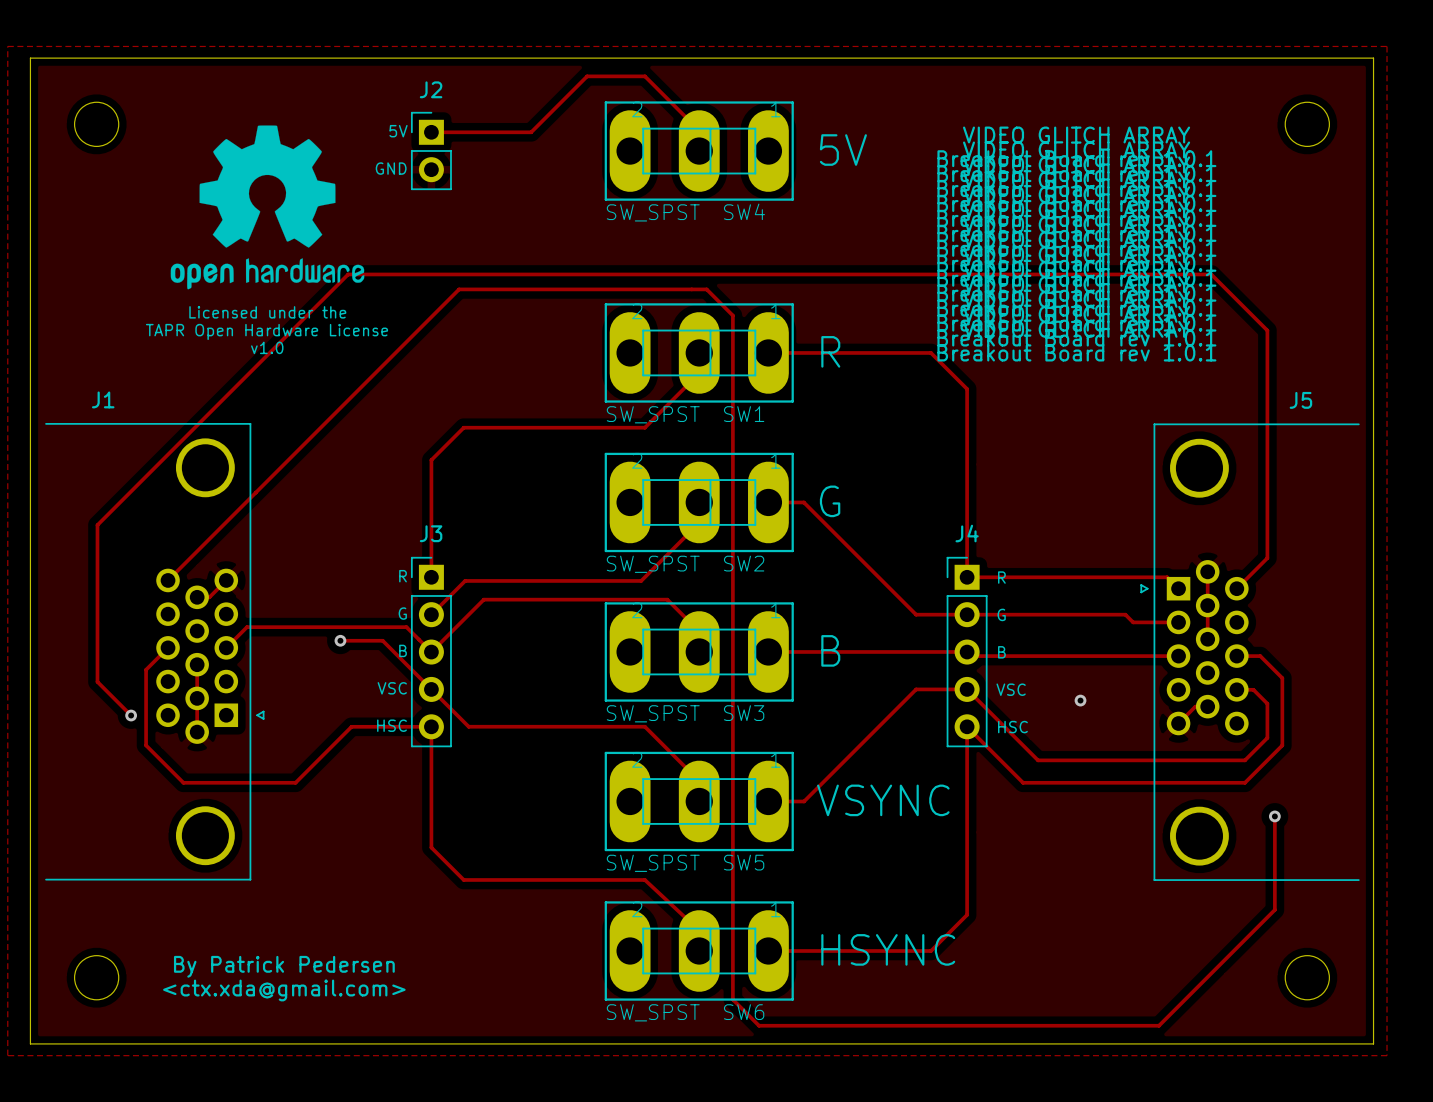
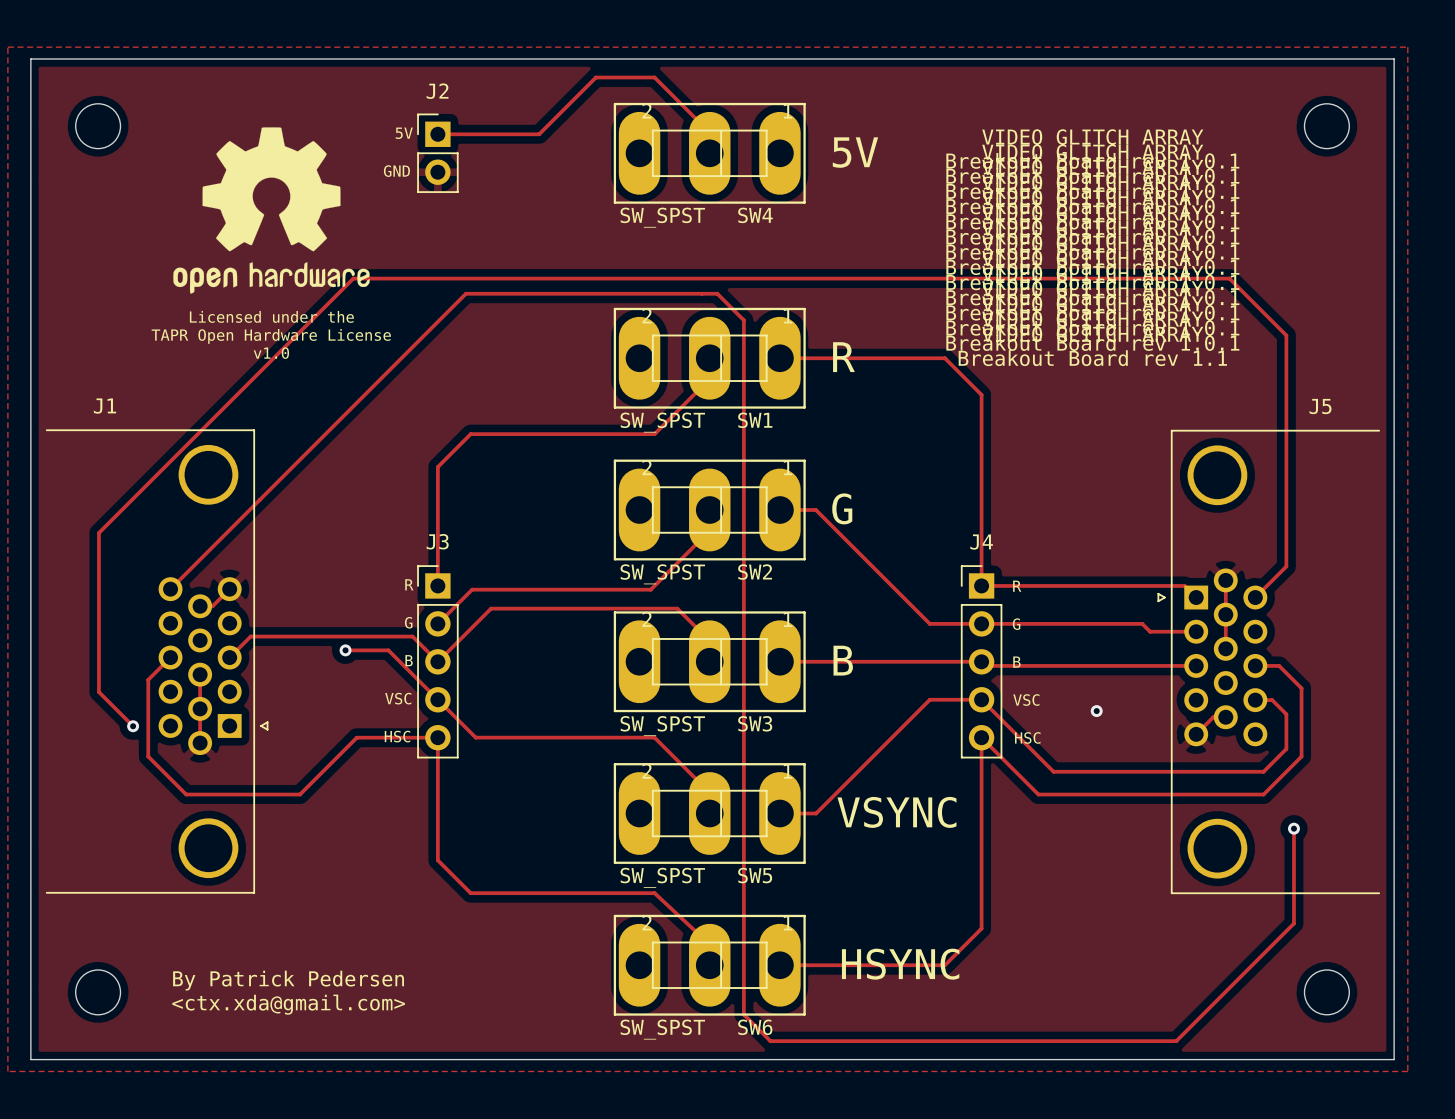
text: Breakout Board rev 1.0.1 (1076, 353) -> Breakout Board rev 1.1 (1092, 358)

